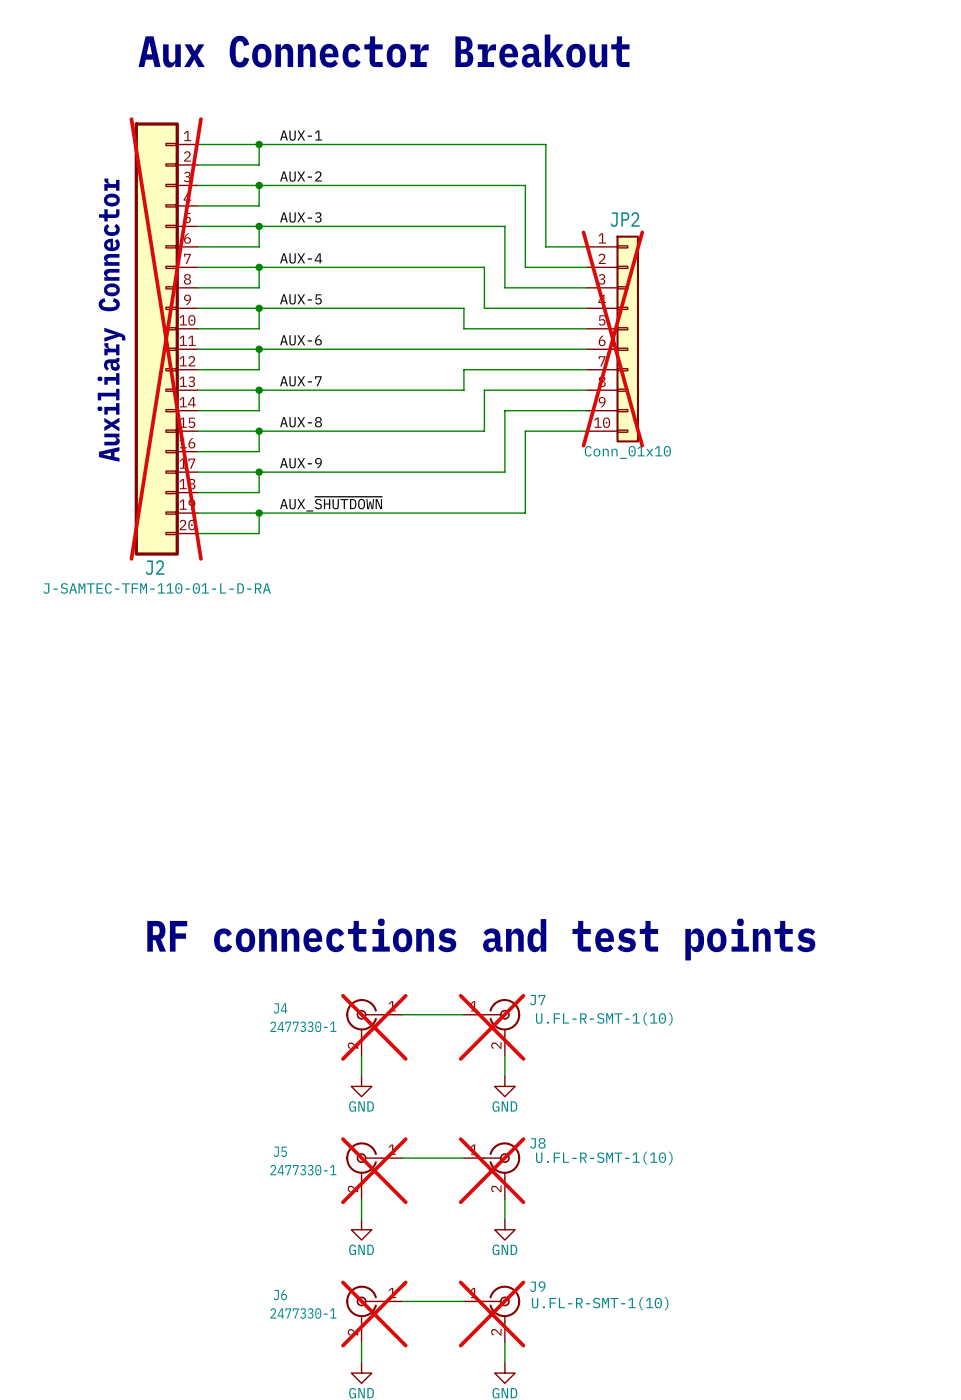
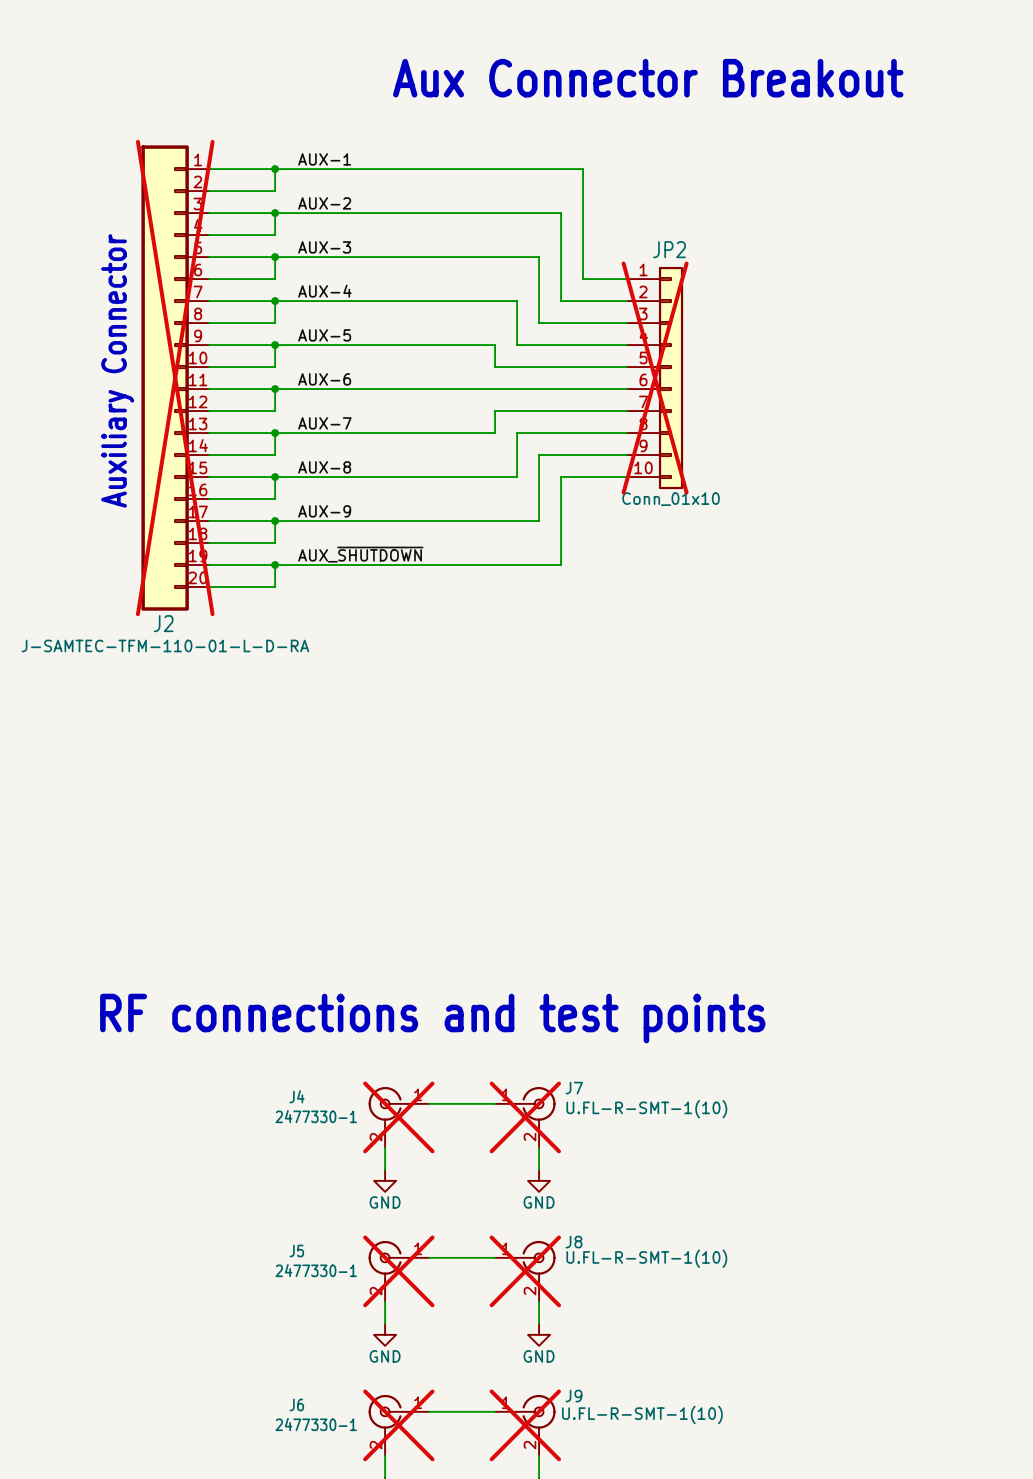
text: Aux Connector Breakout (384, 51) -> none
text: none -> Aux Connector Breakout (648, 78)
text position: RF connections and test points (481, 939) -> RF connections and test points (432, 1018)

